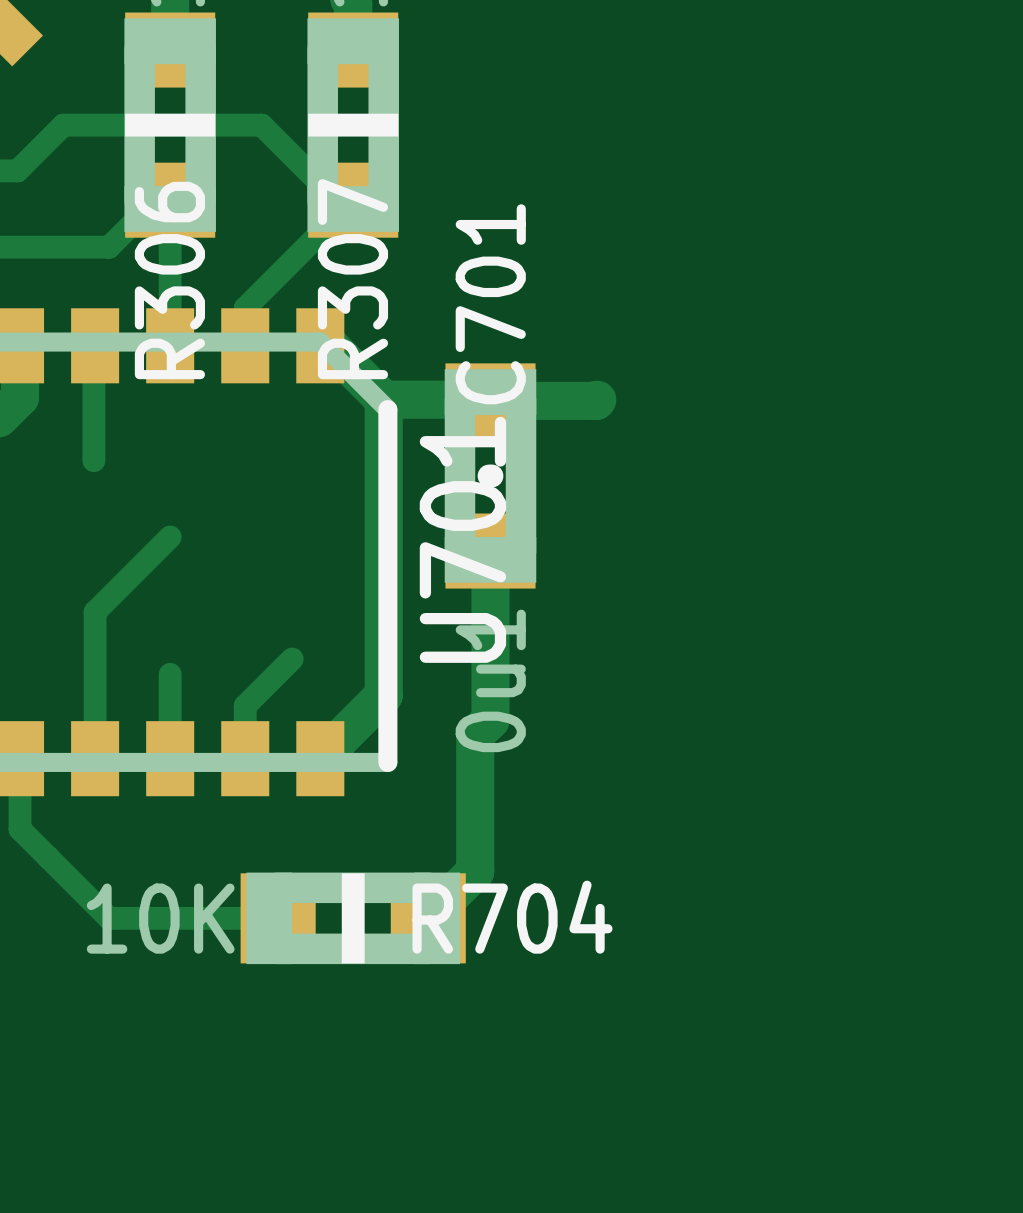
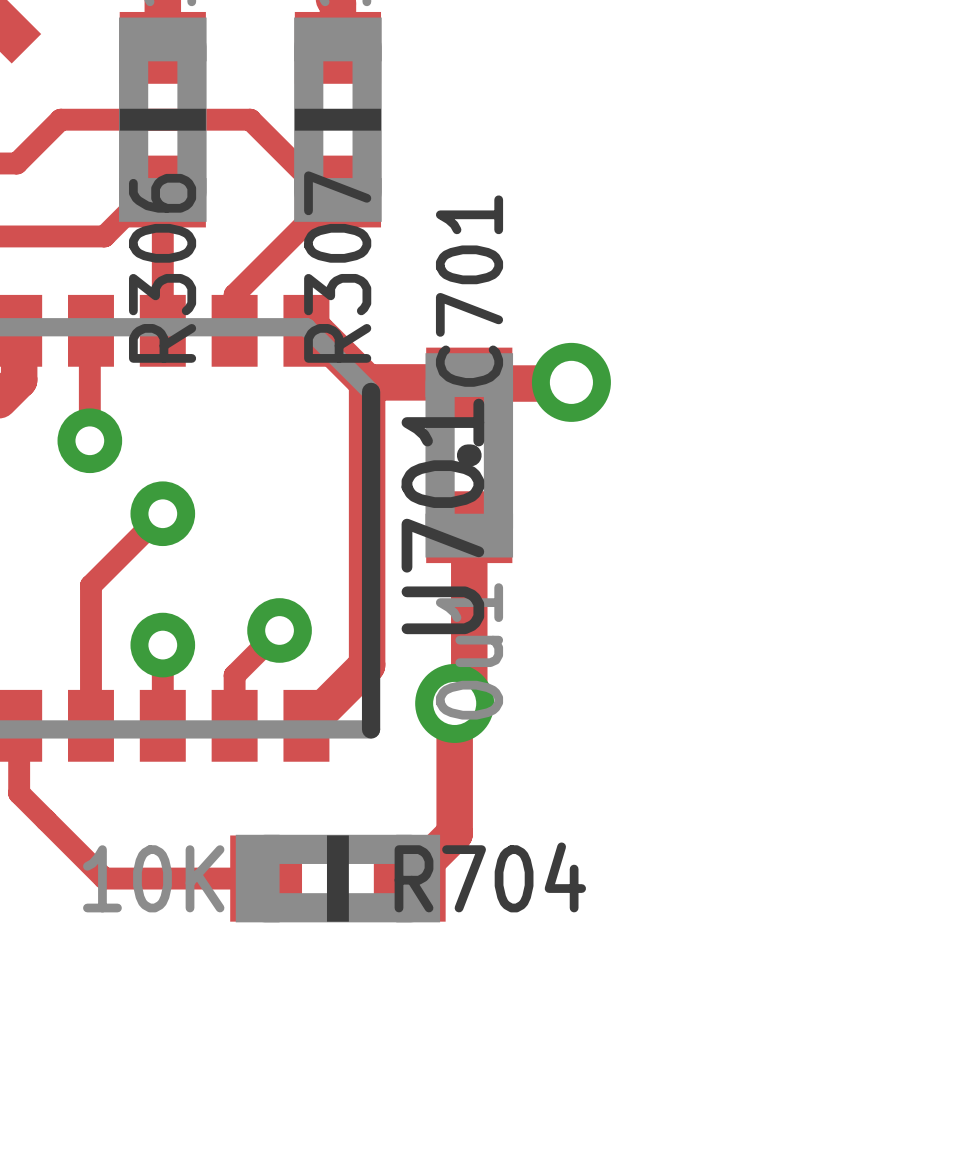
via: none -> (571, 382)
via: none -> (89, 440)
via: none -> (162, 513)
via: none -> (279, 630)
via: none -> (162, 645)
via: none -> (454, 703)

